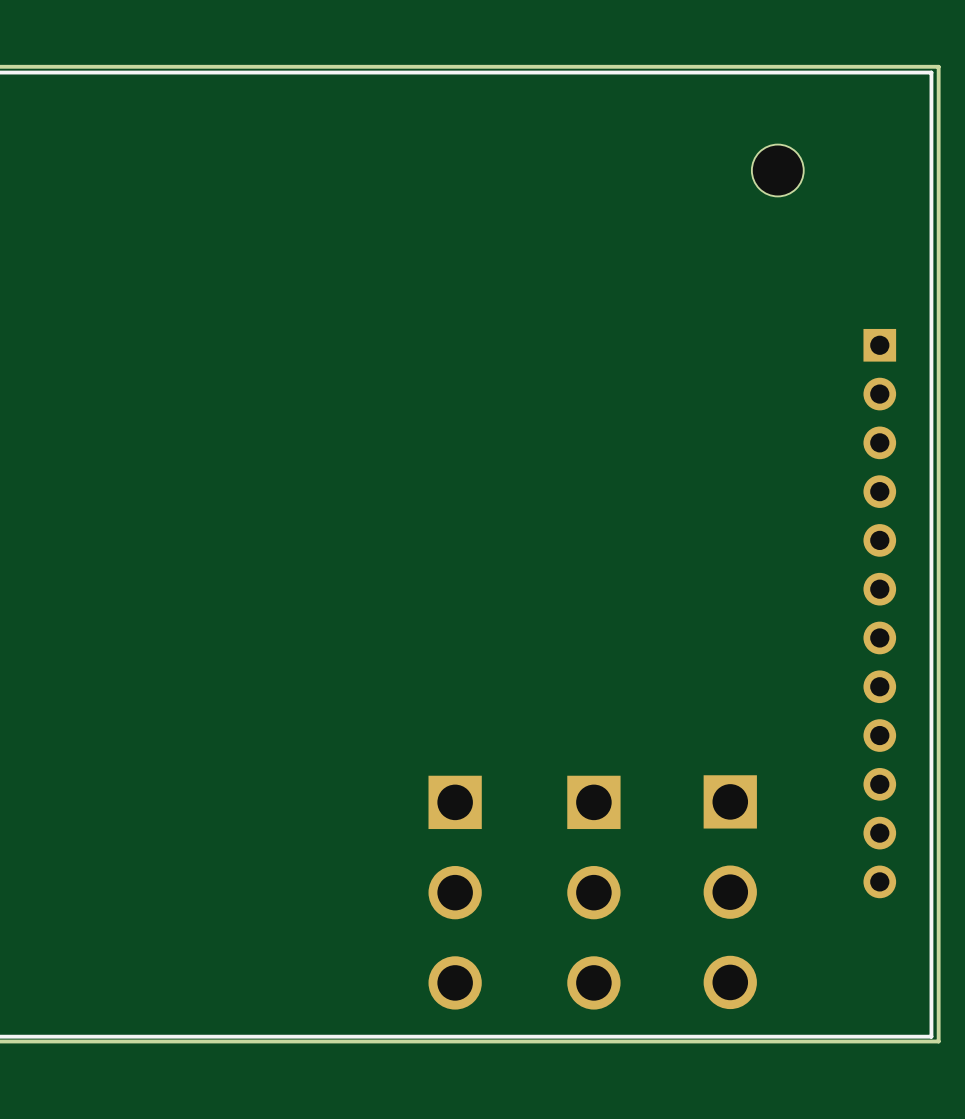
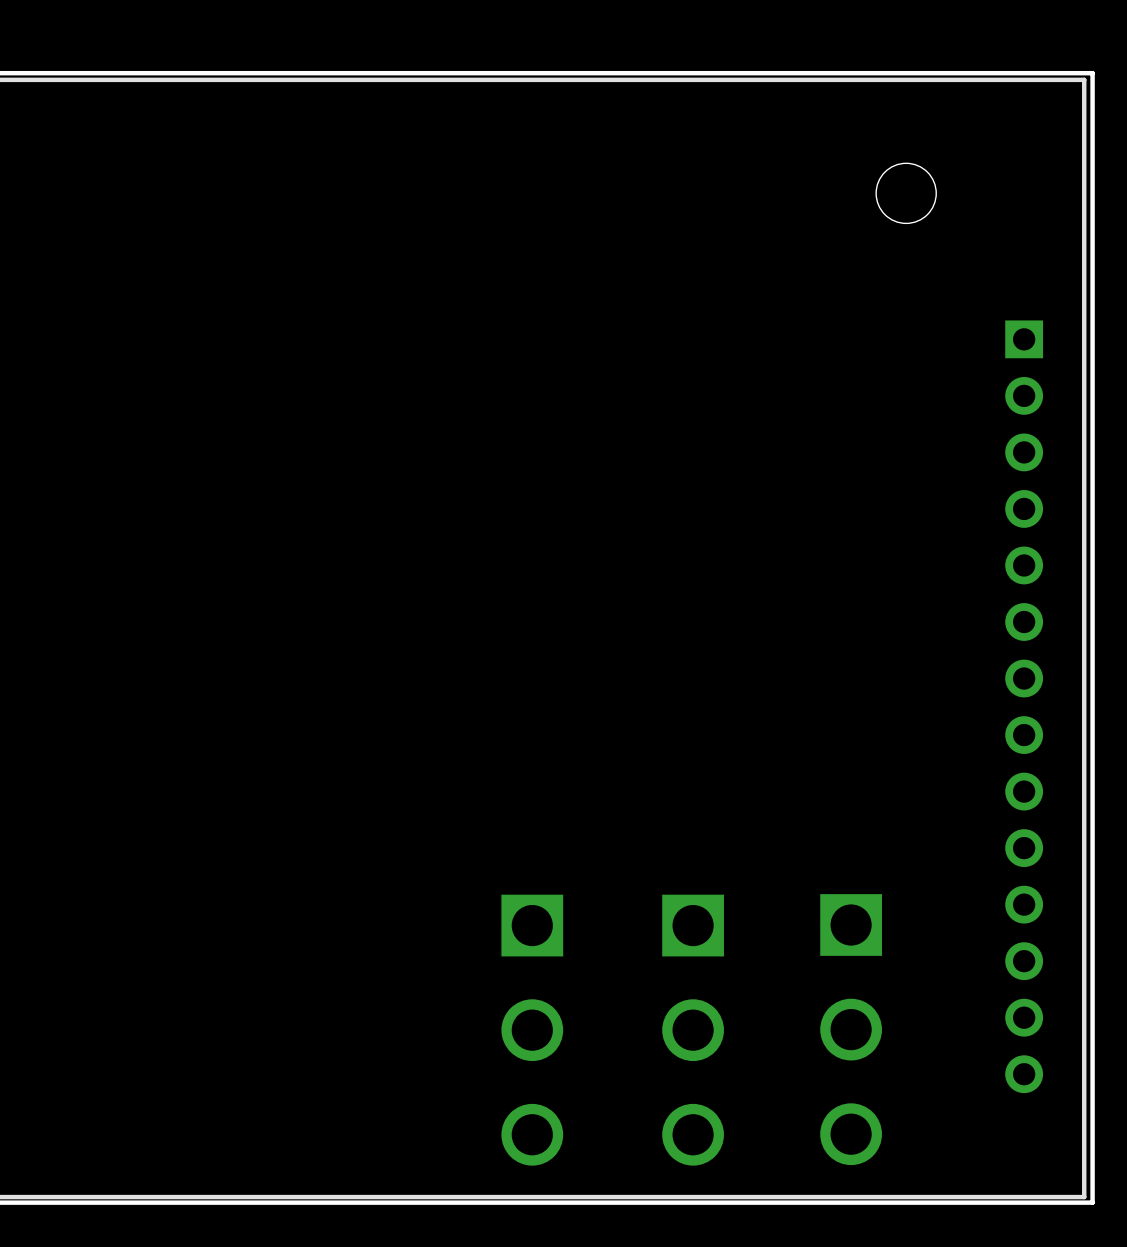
part footprint: [863, 328, 897, 899] -> [1005, 320, 1044, 1094]

